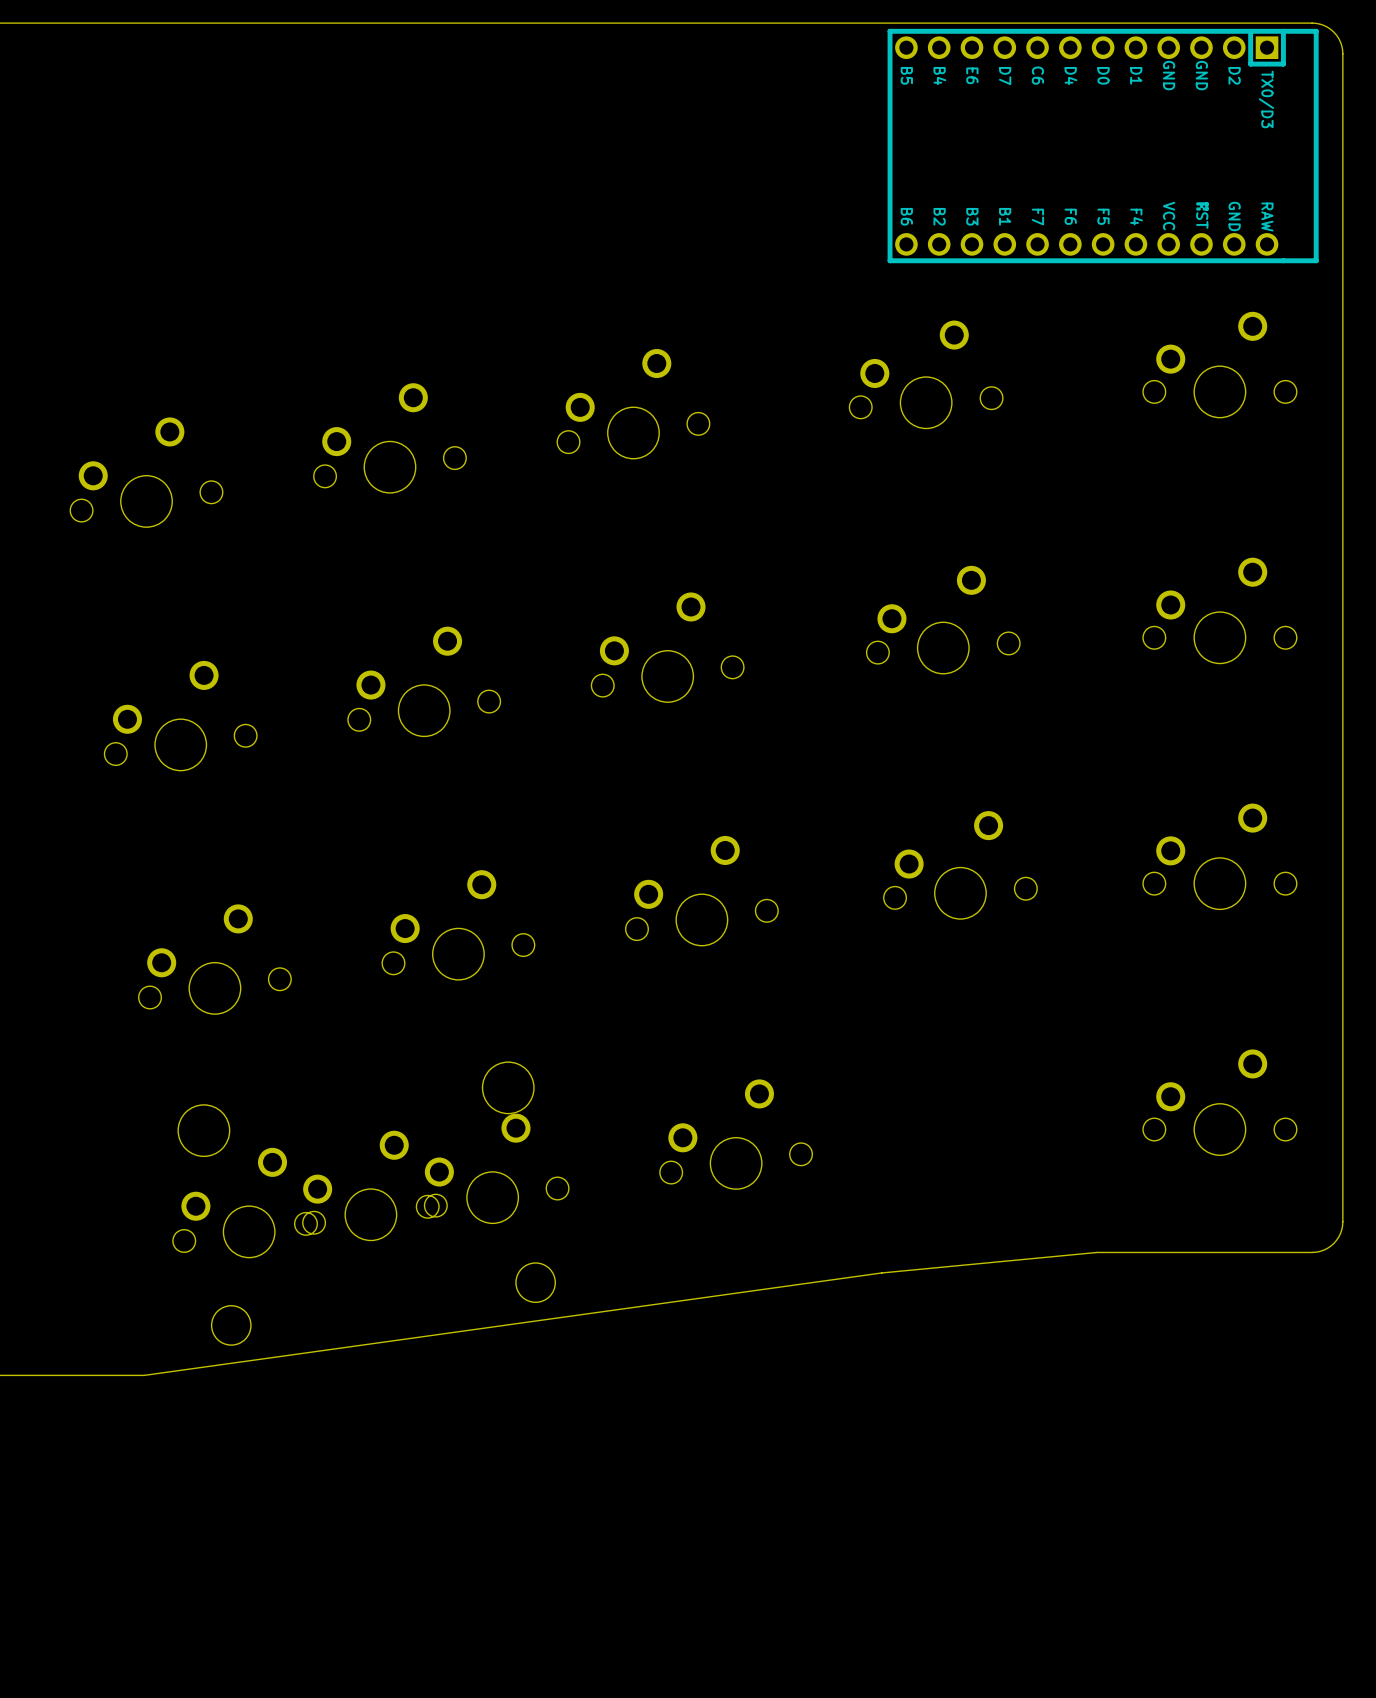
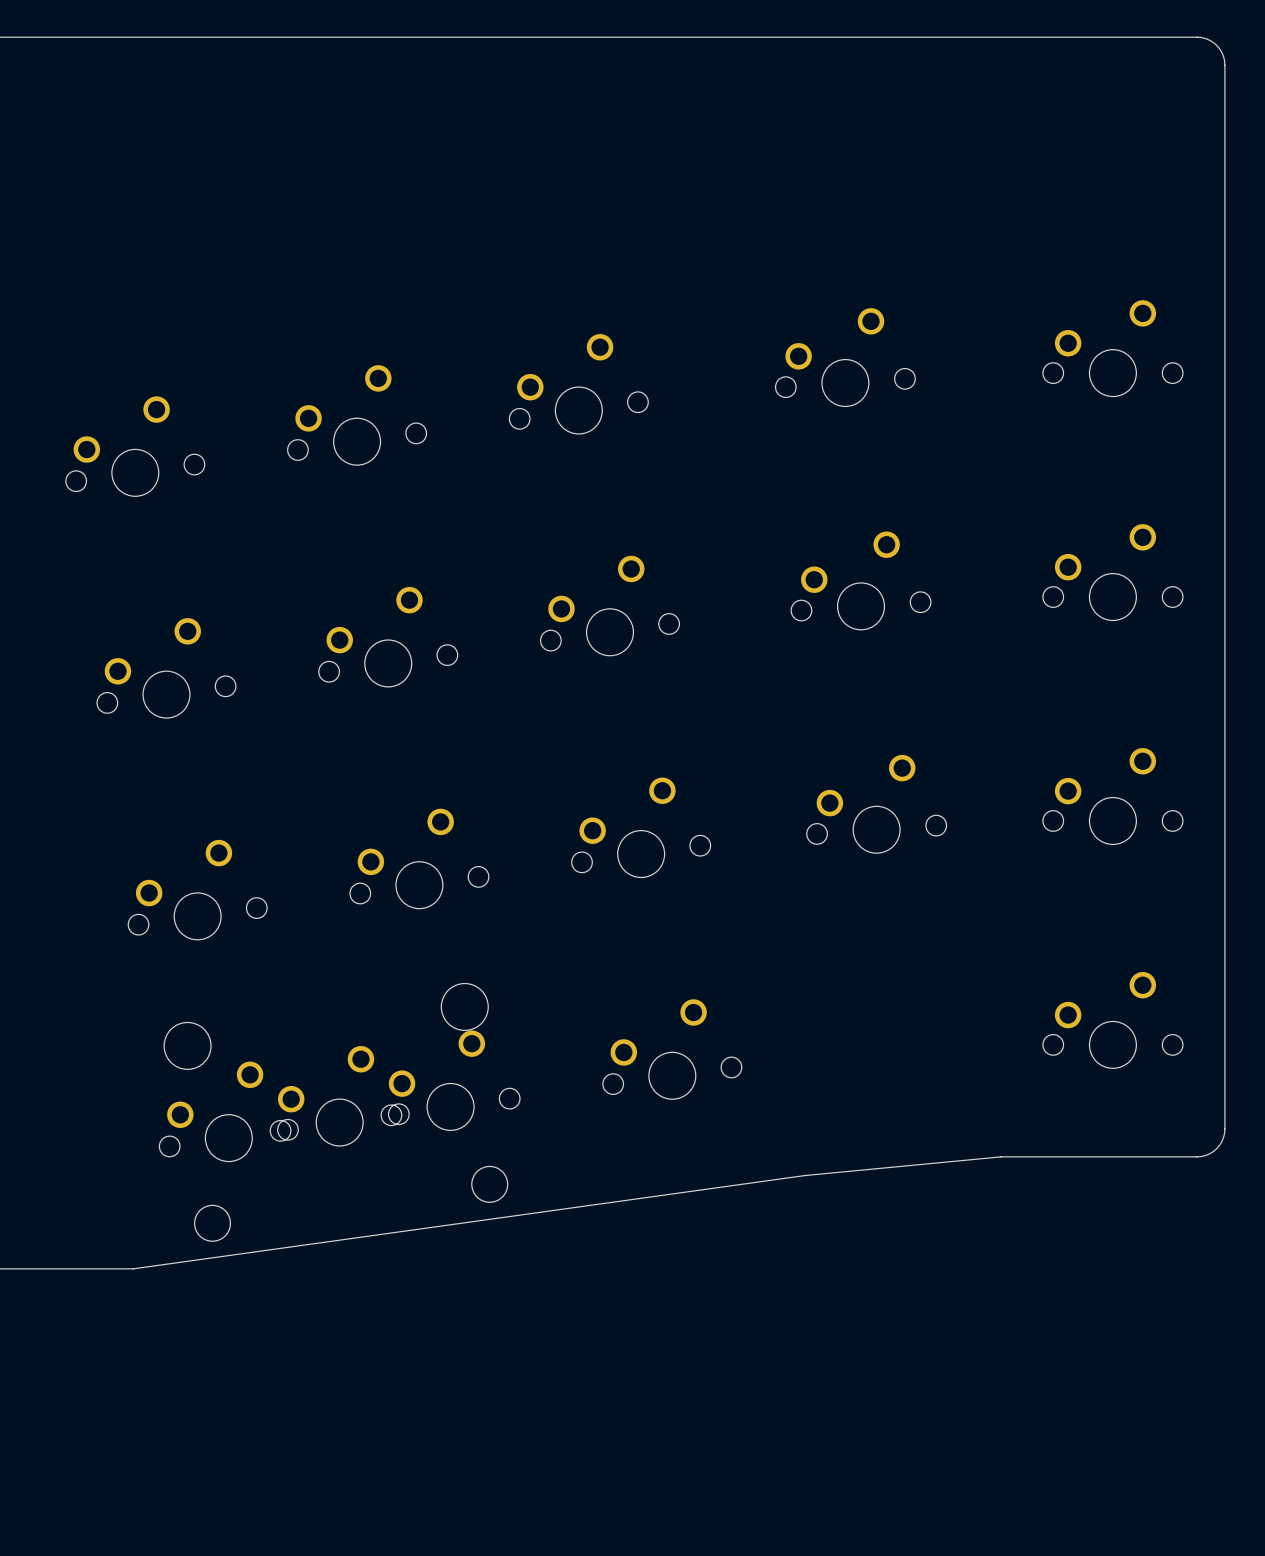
part: (1103, 146) -> none

